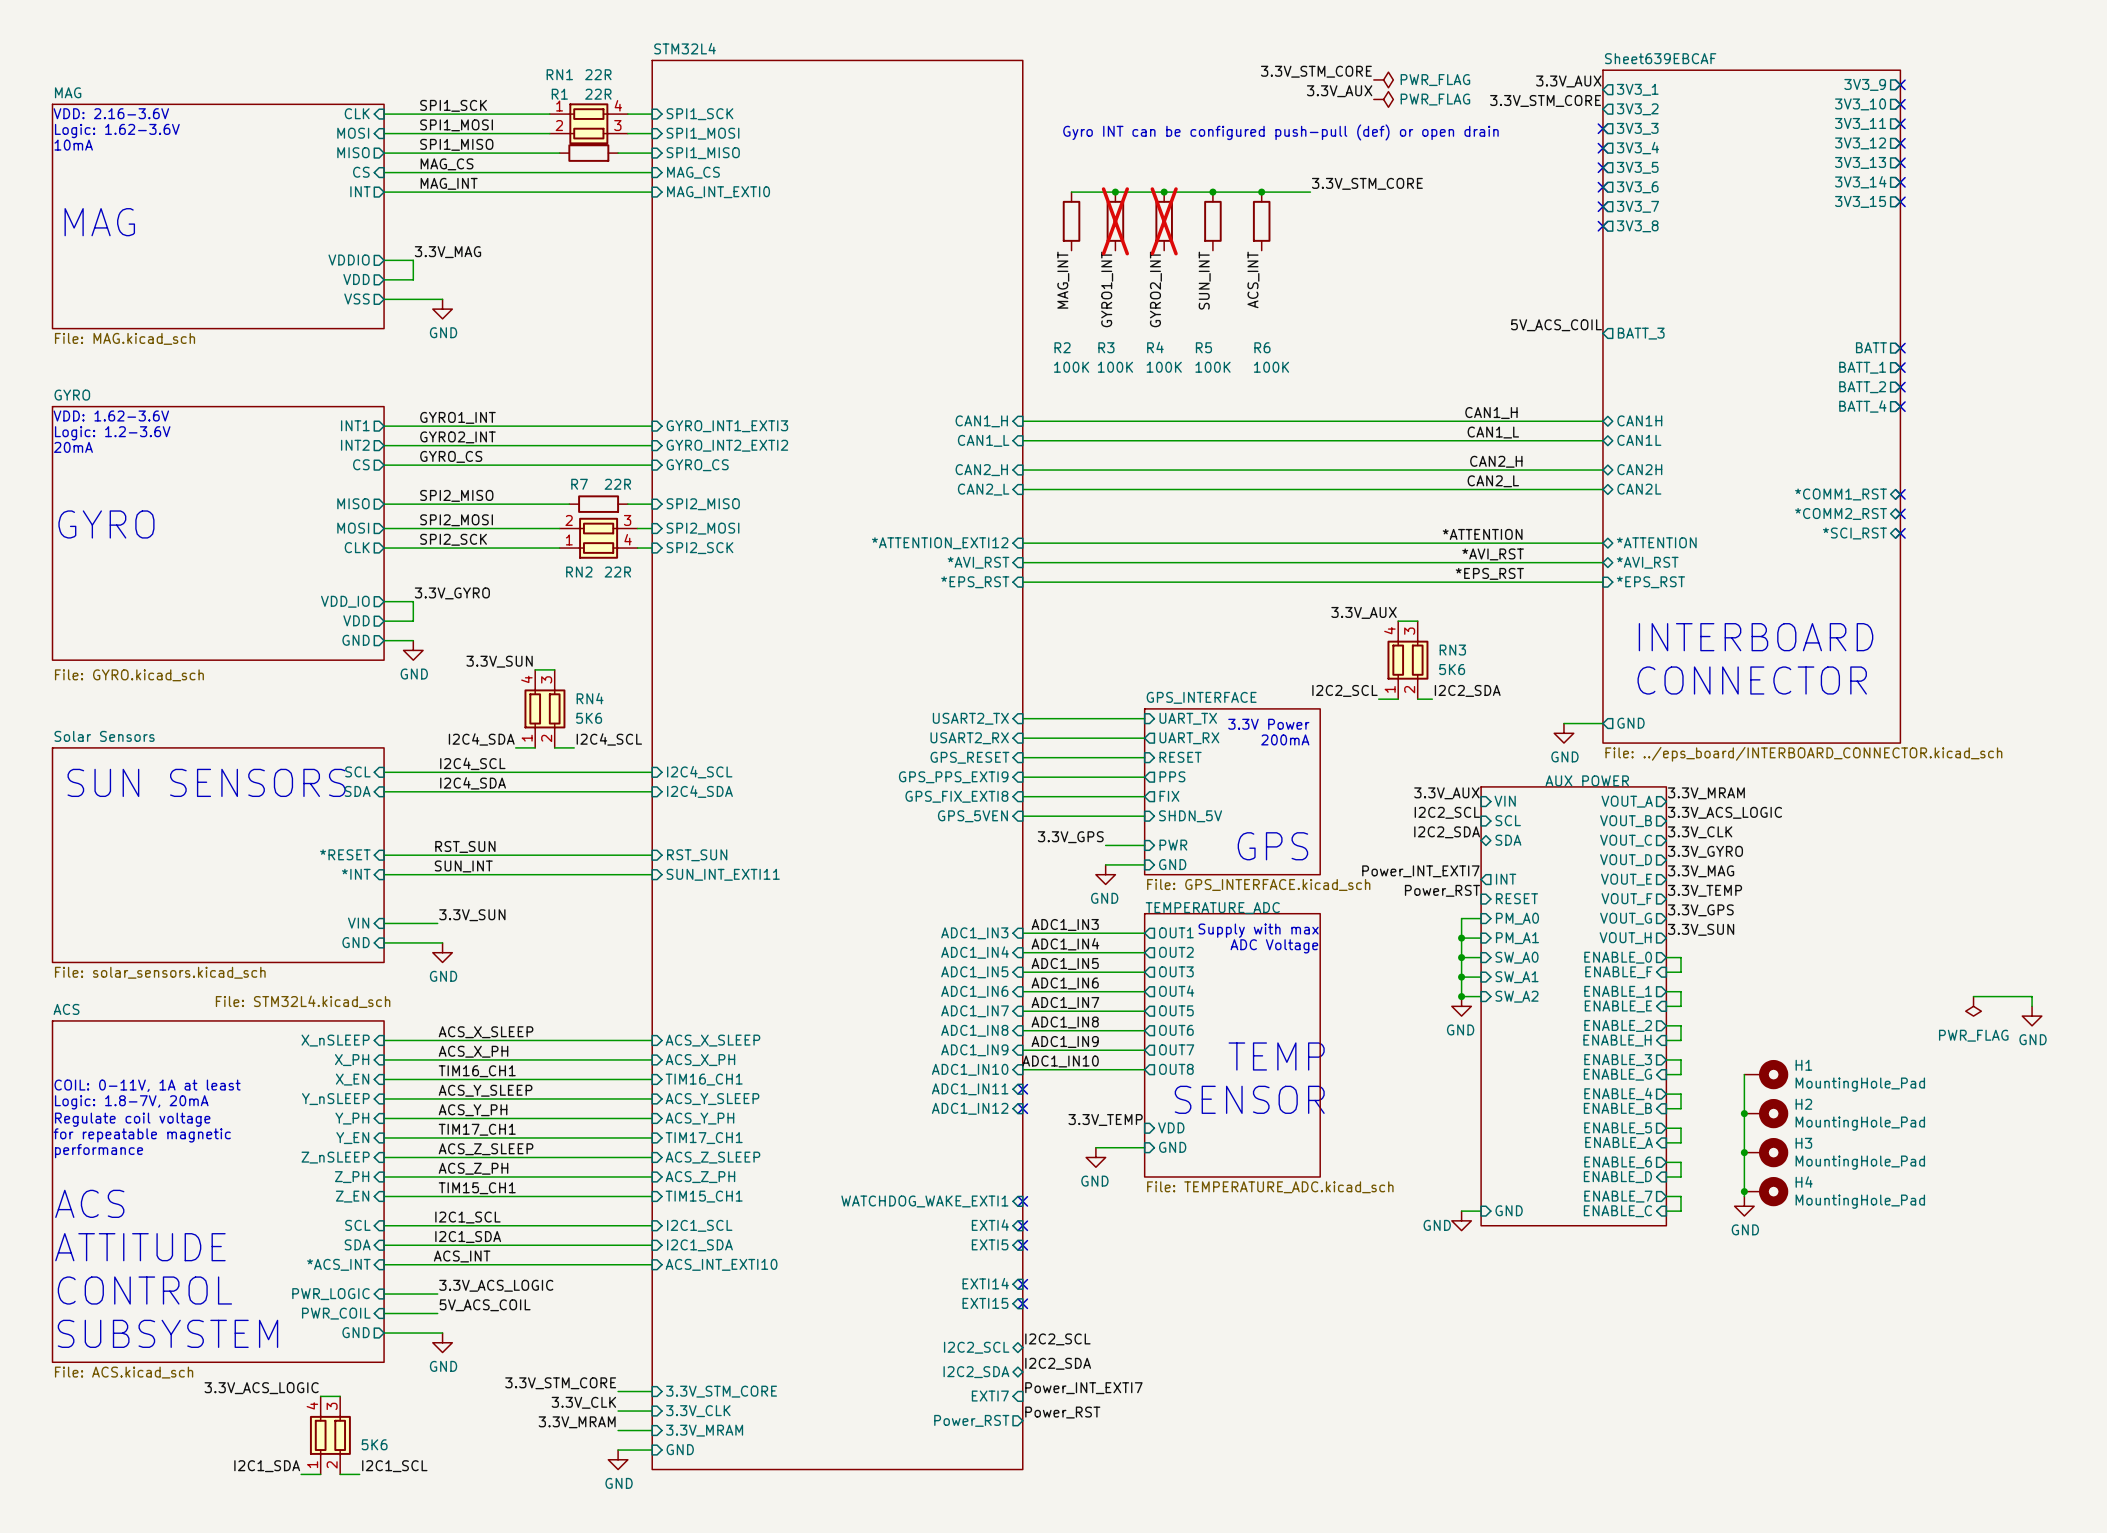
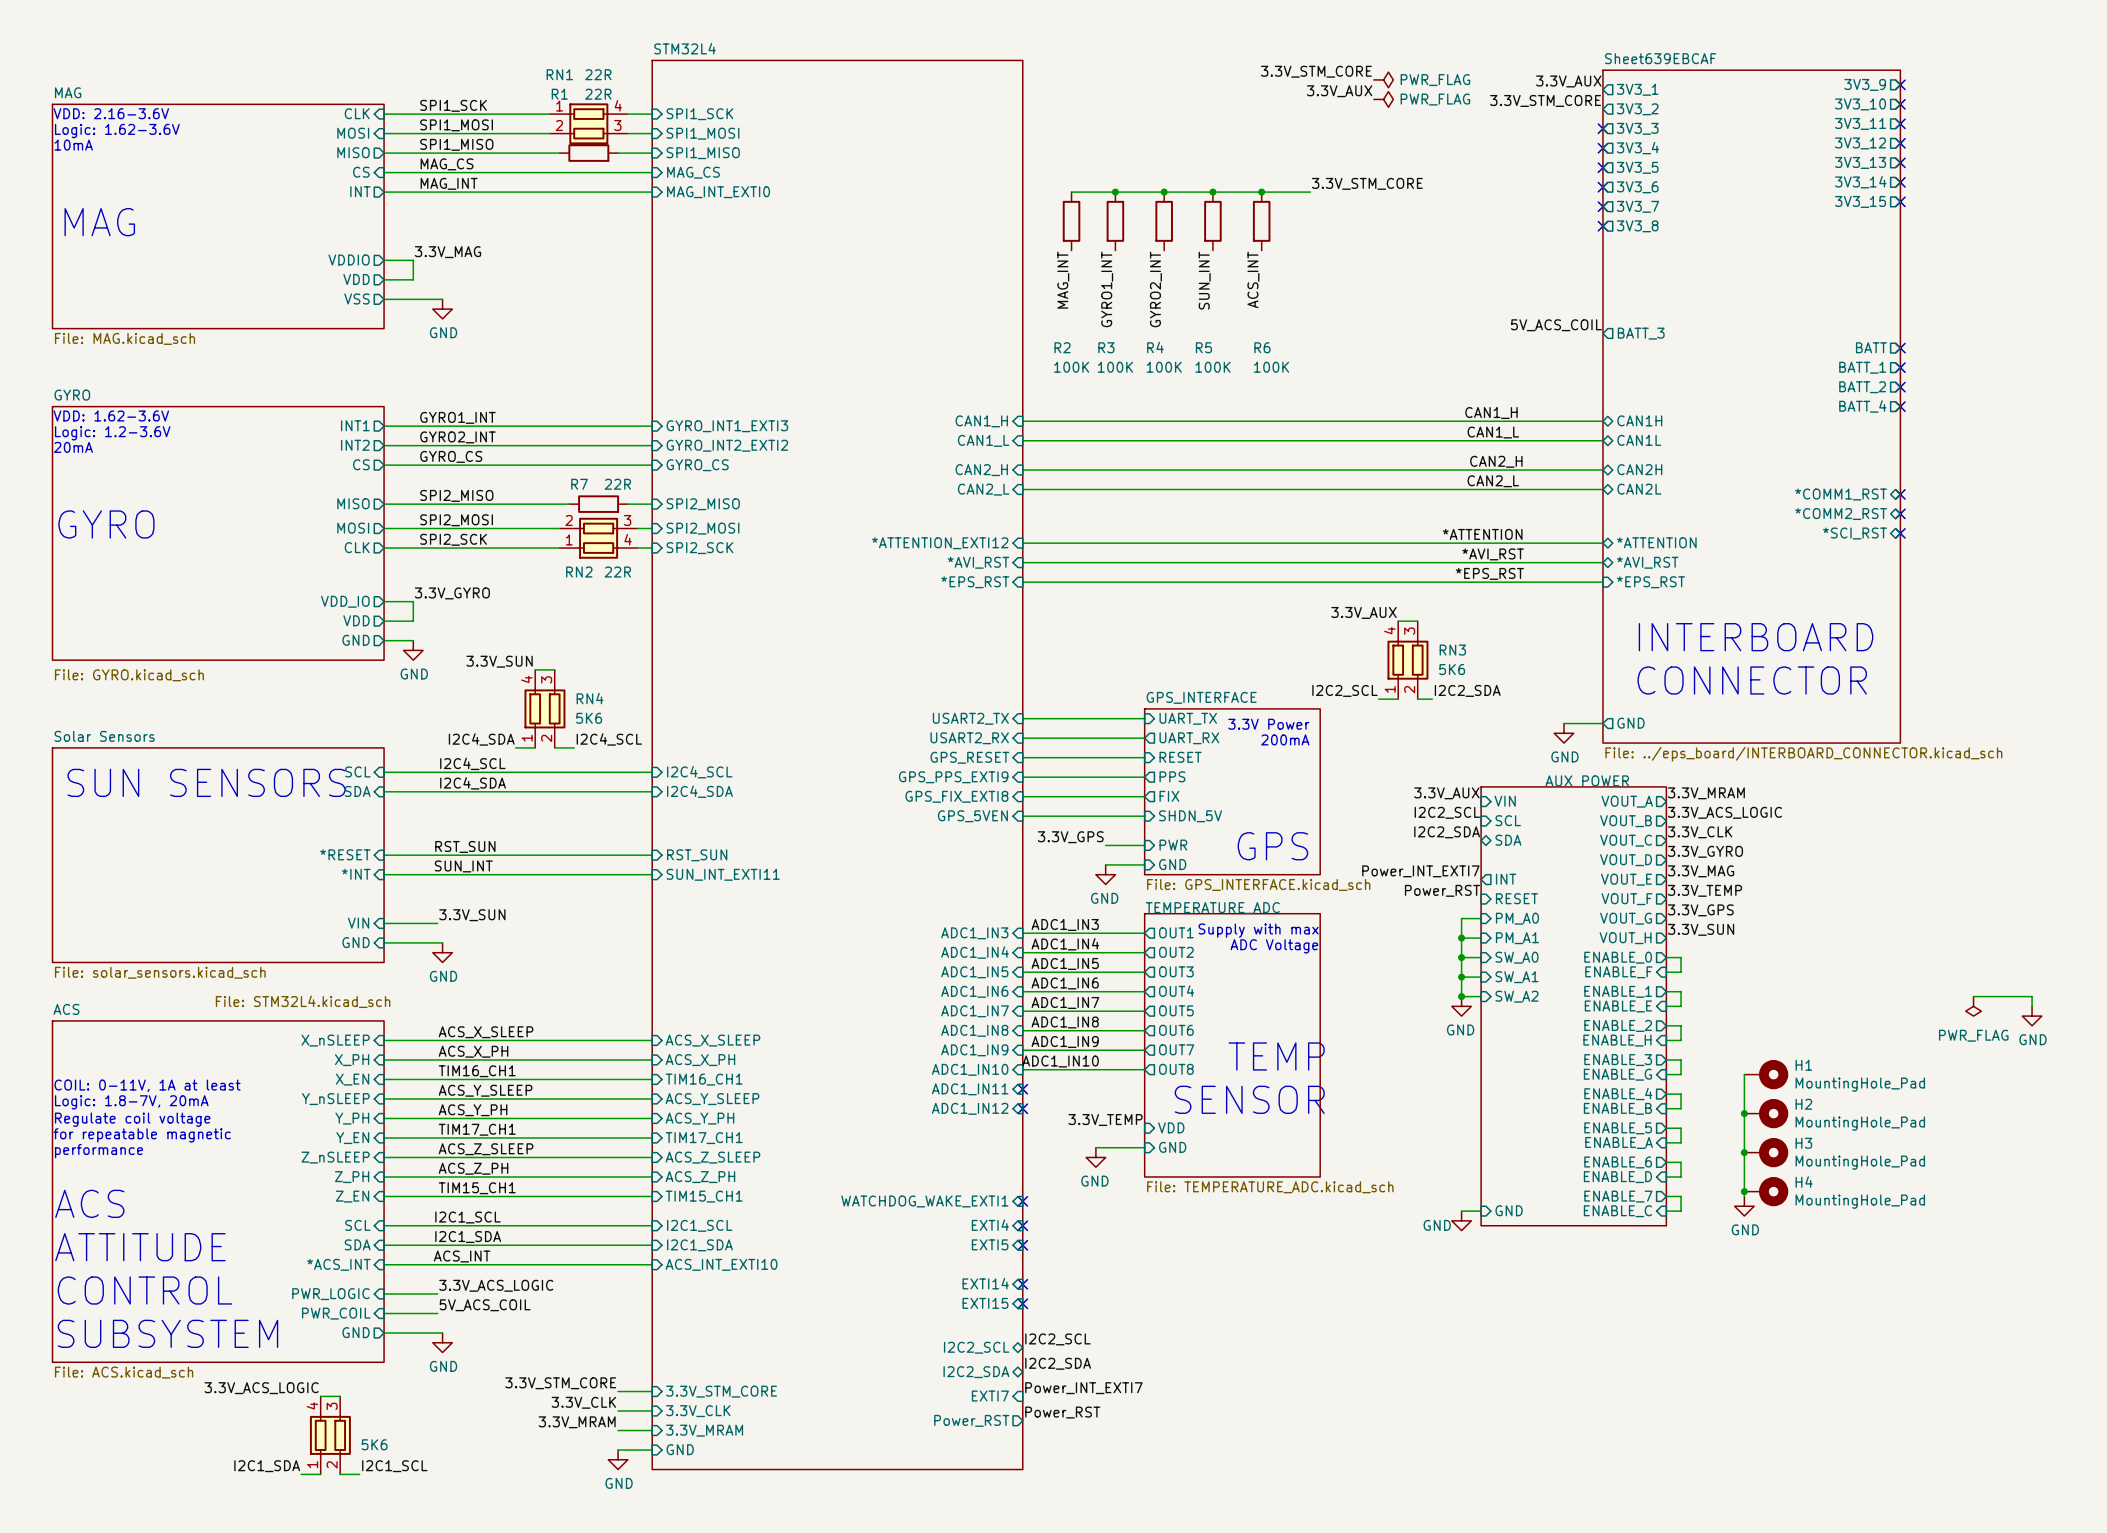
text: Gyro INT can be configured push-pull (def) or open drain (1280, 132) -> none
R3 do-not-place cross: (1115, 221) -> none
R4 do-not-place cross: (1164, 221) -> none

